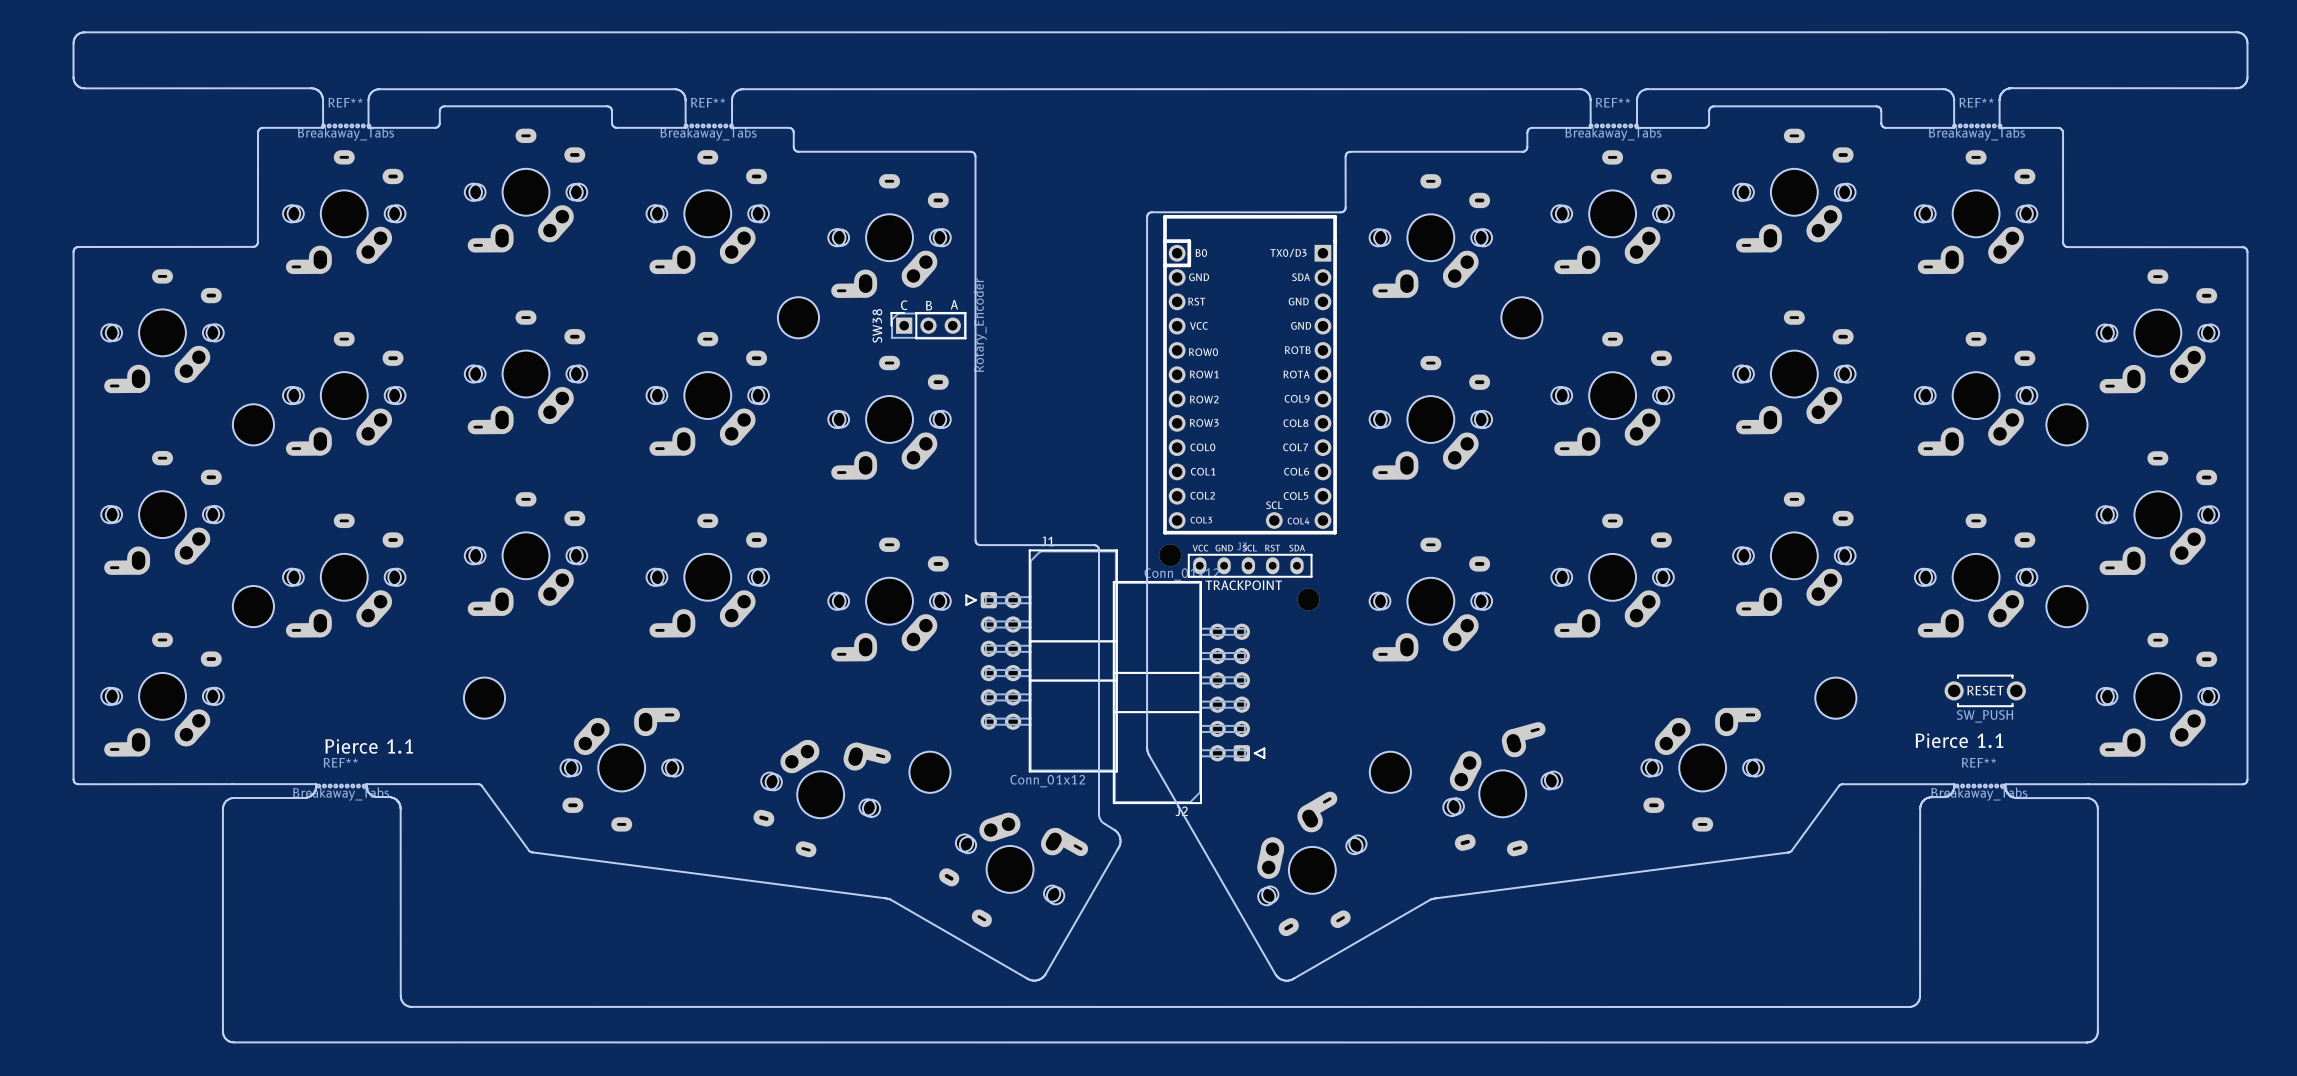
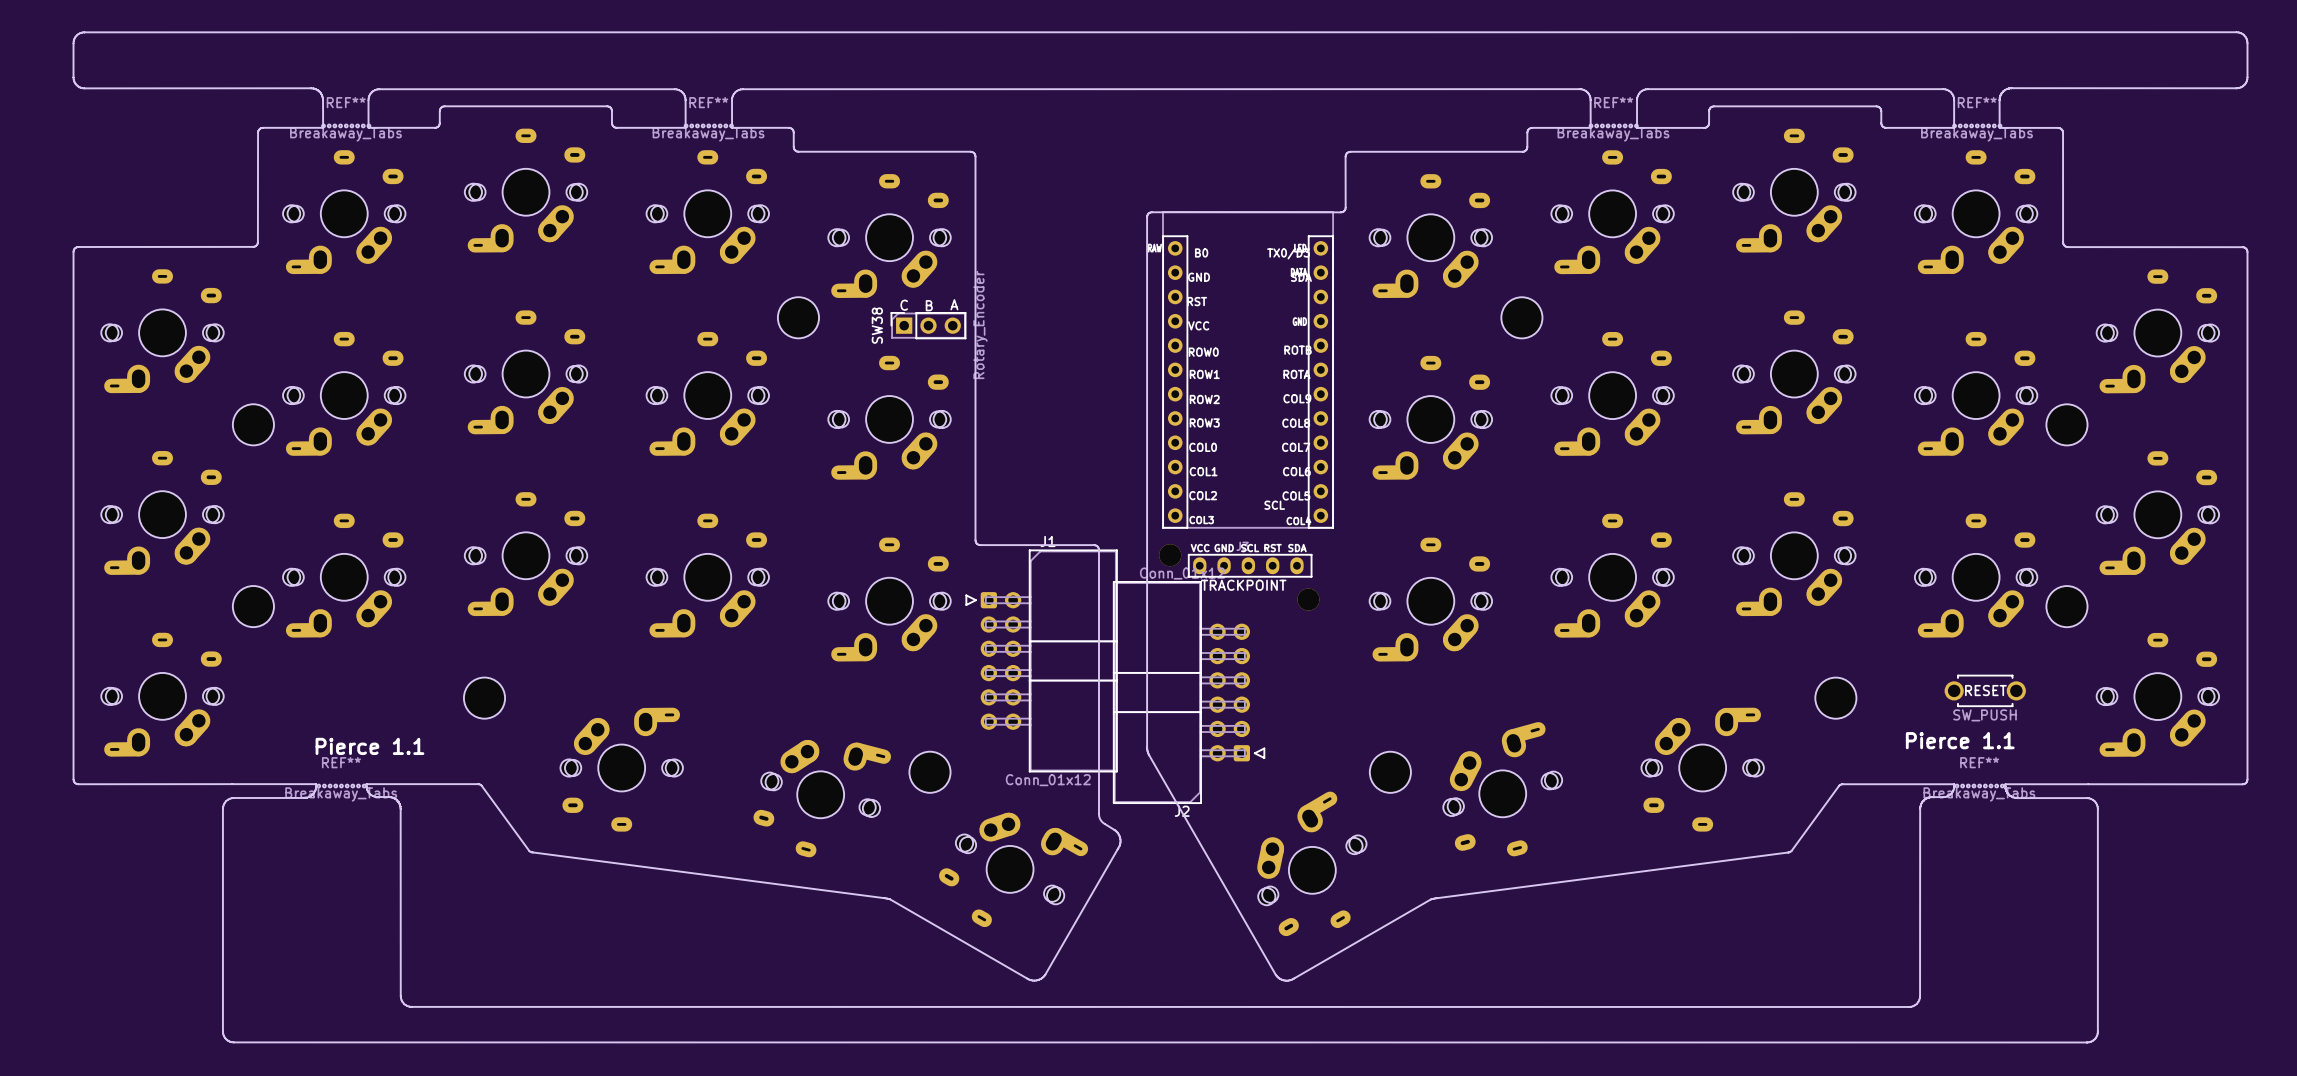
part footprint: [1163, 214, 1337, 535] -> [1162, 211, 1334, 529]

